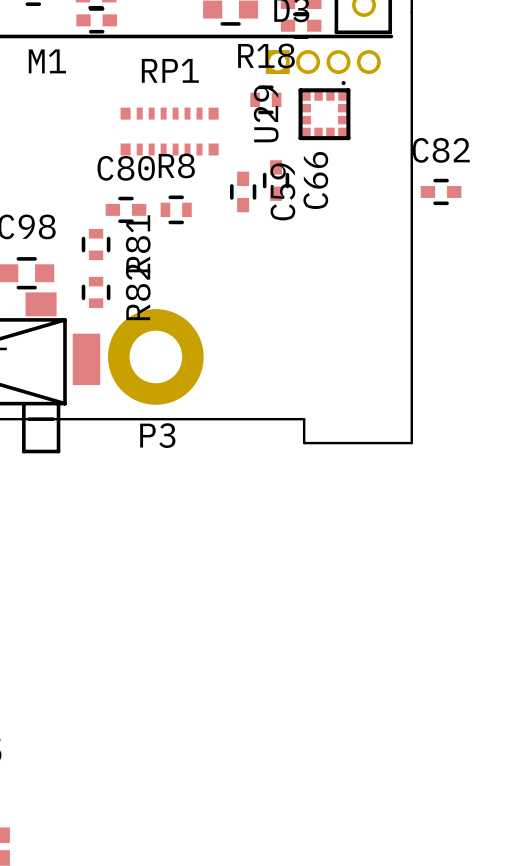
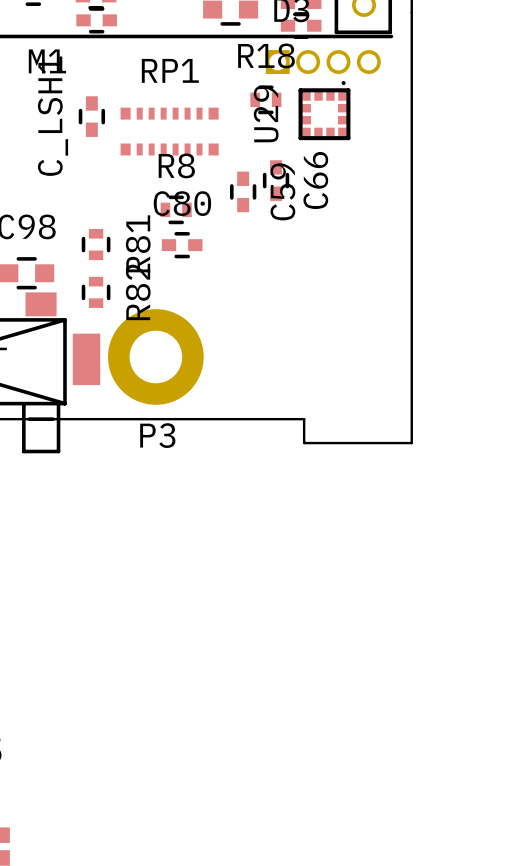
C_LSH1: none -> (91, 116)
C82: (441, 191) -> none
C80 position: (125, 209) -> (182, 245)

